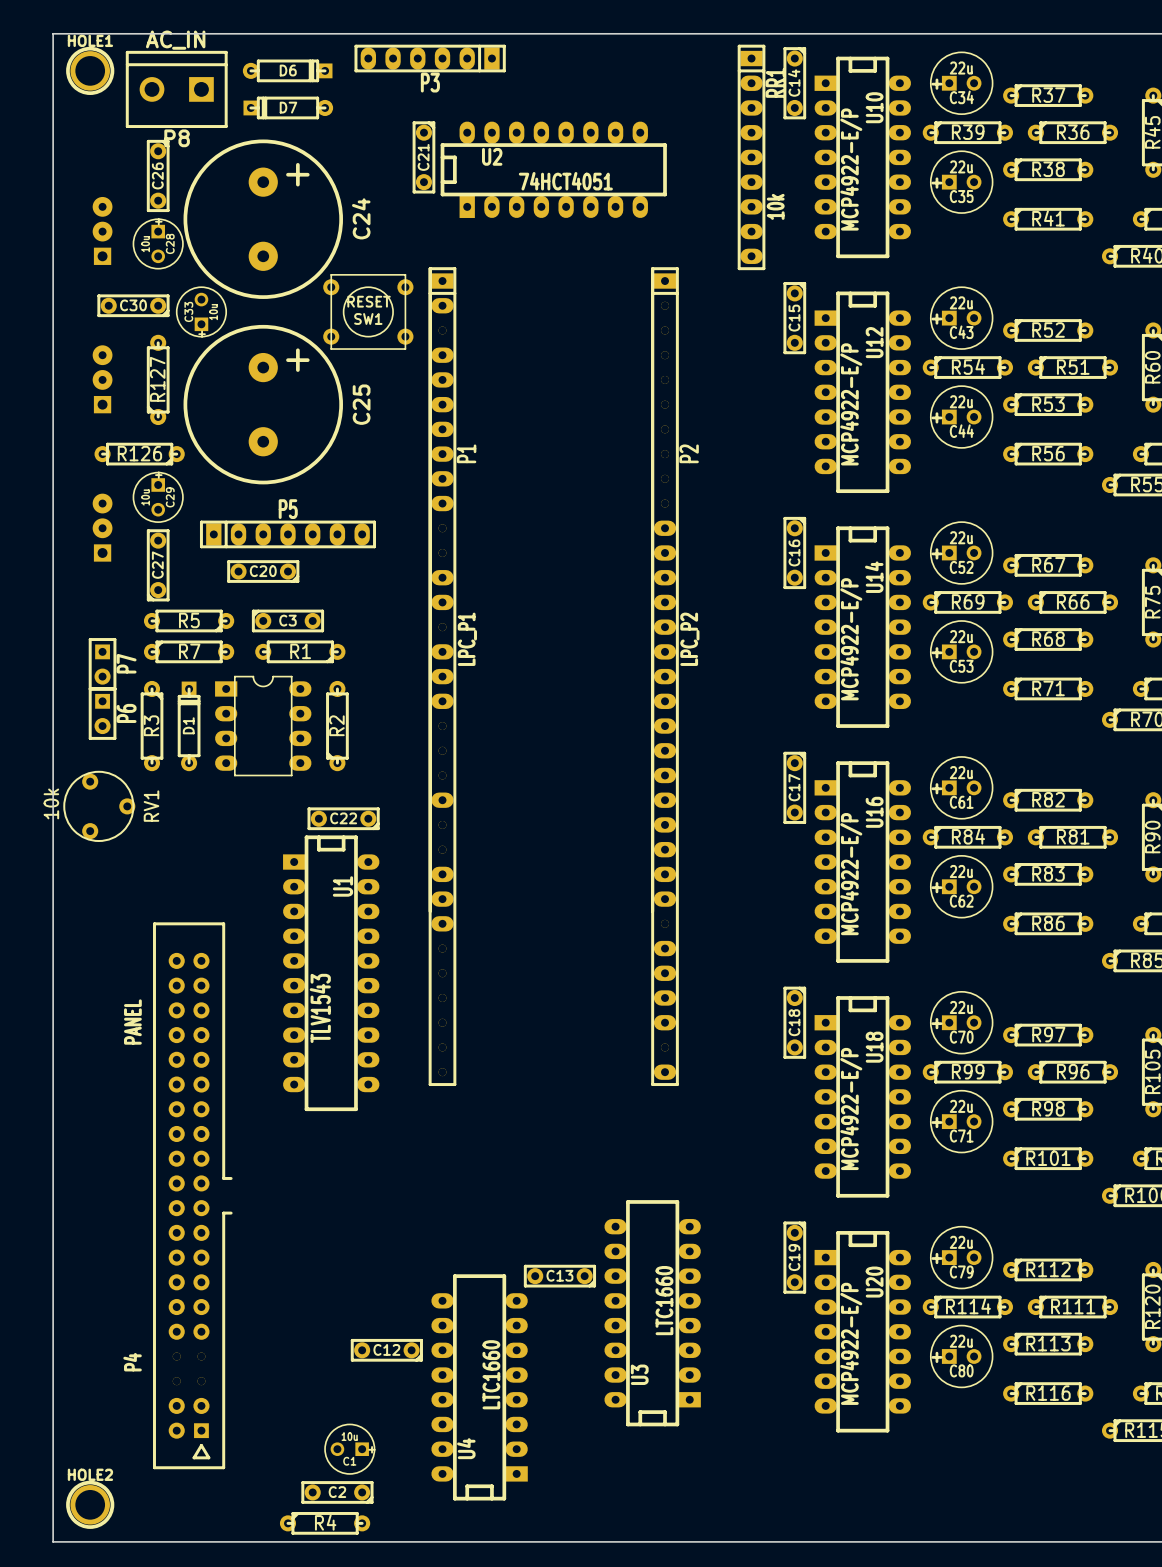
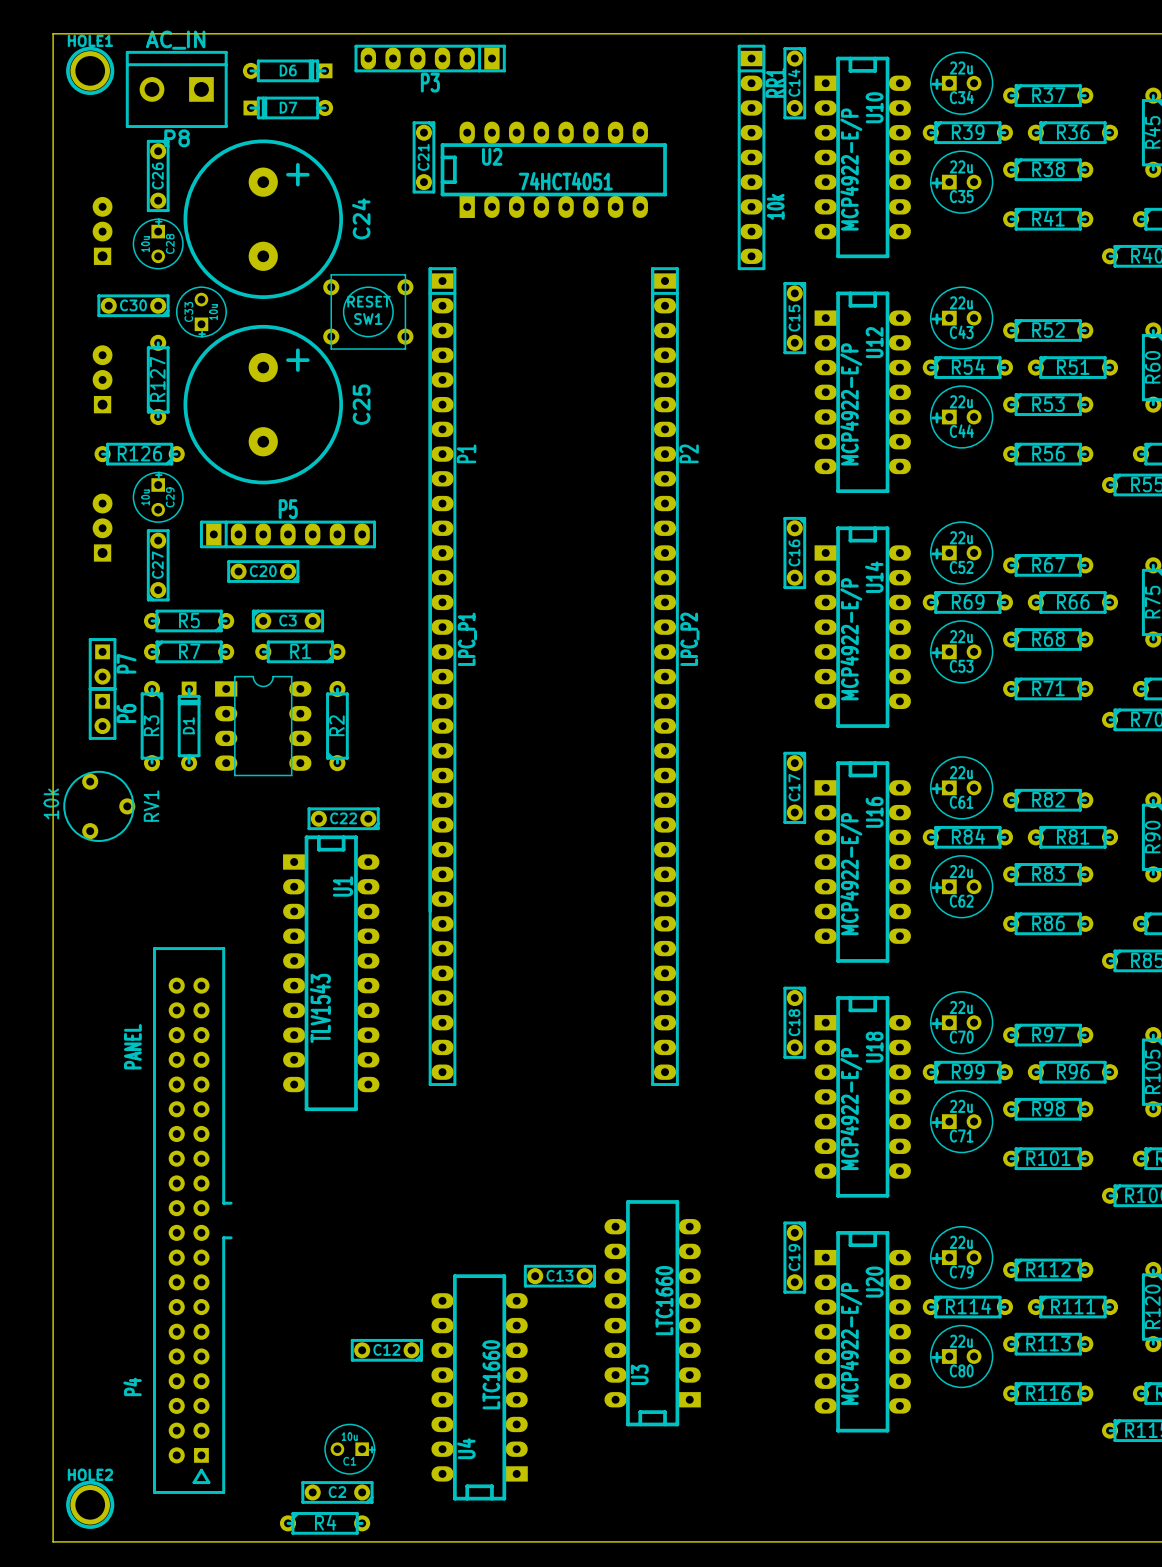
P1 footprint: [428, 267, 457, 1087] -> [428, 267, 457, 1087]
P2 footprint: [651, 267, 679, 1087] -> [651, 267, 679, 1087]
P4 footprint: [153, 922, 233, 1470] -> [153, 947, 233, 1494]

